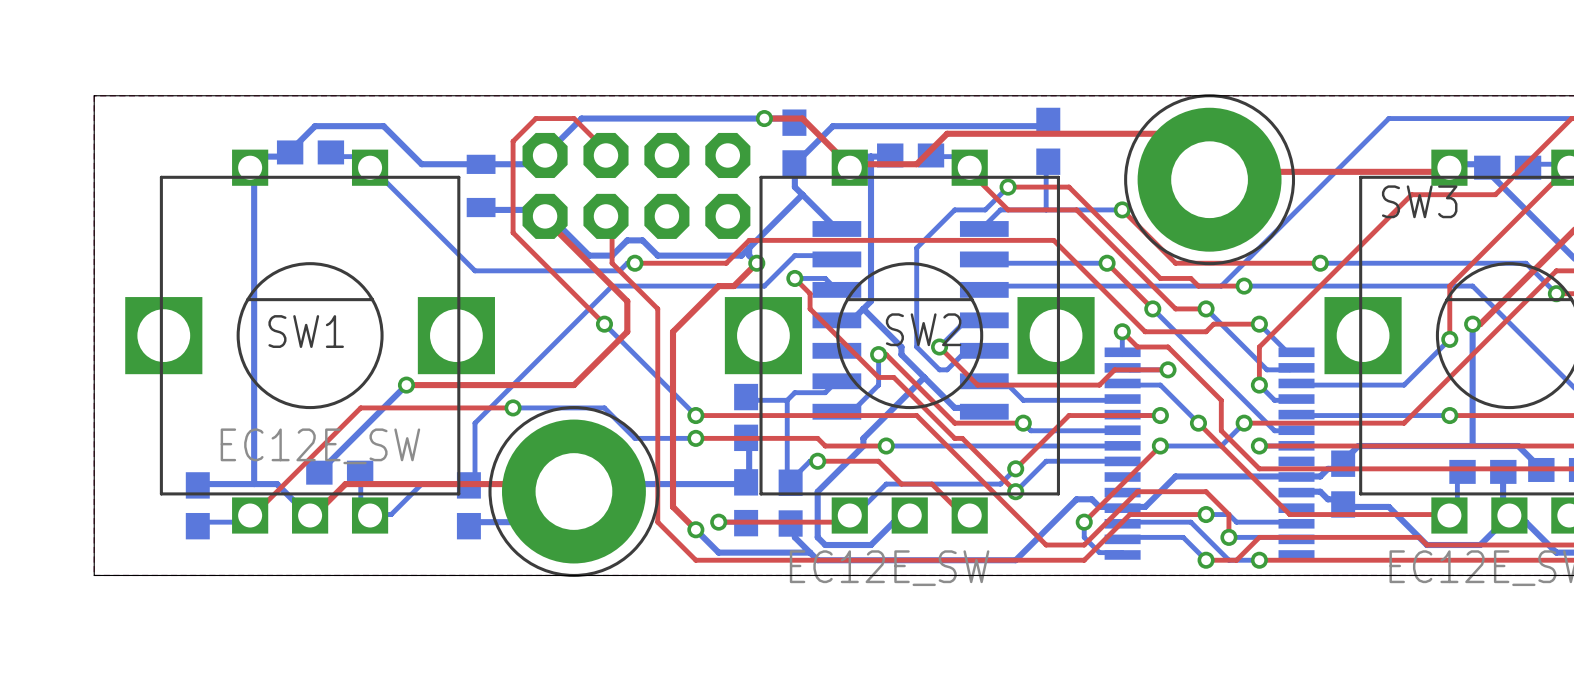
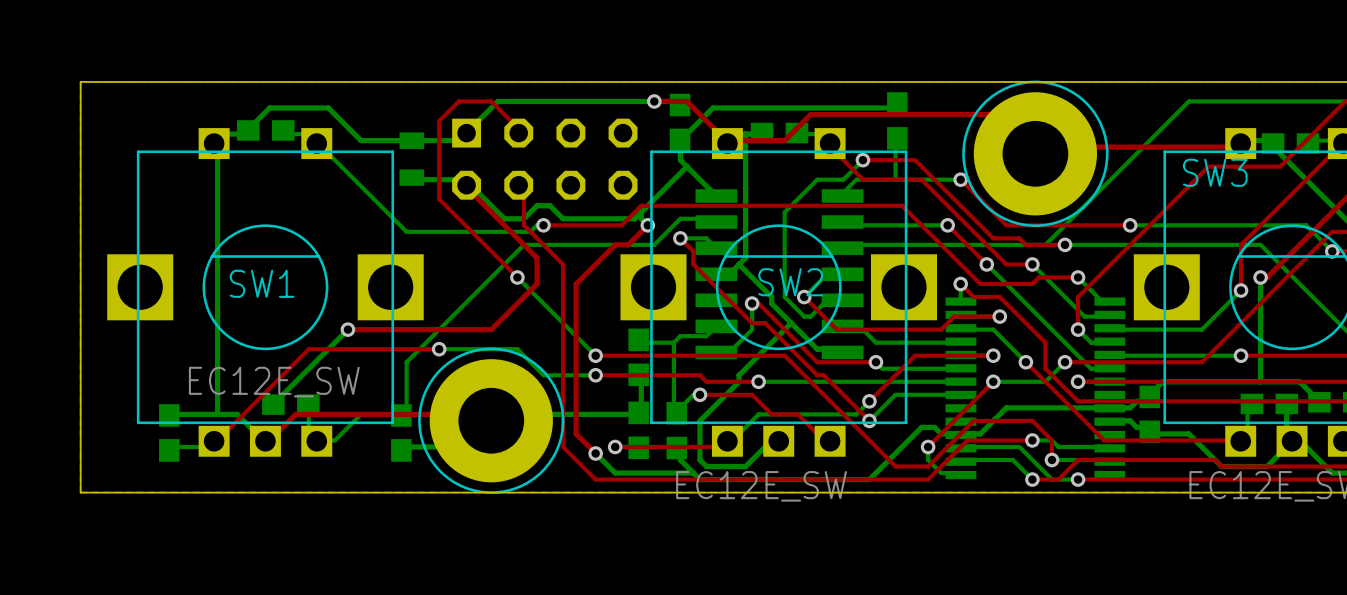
part footprint: [522, 132, 751, 239] -> [452, 118, 638, 200]

